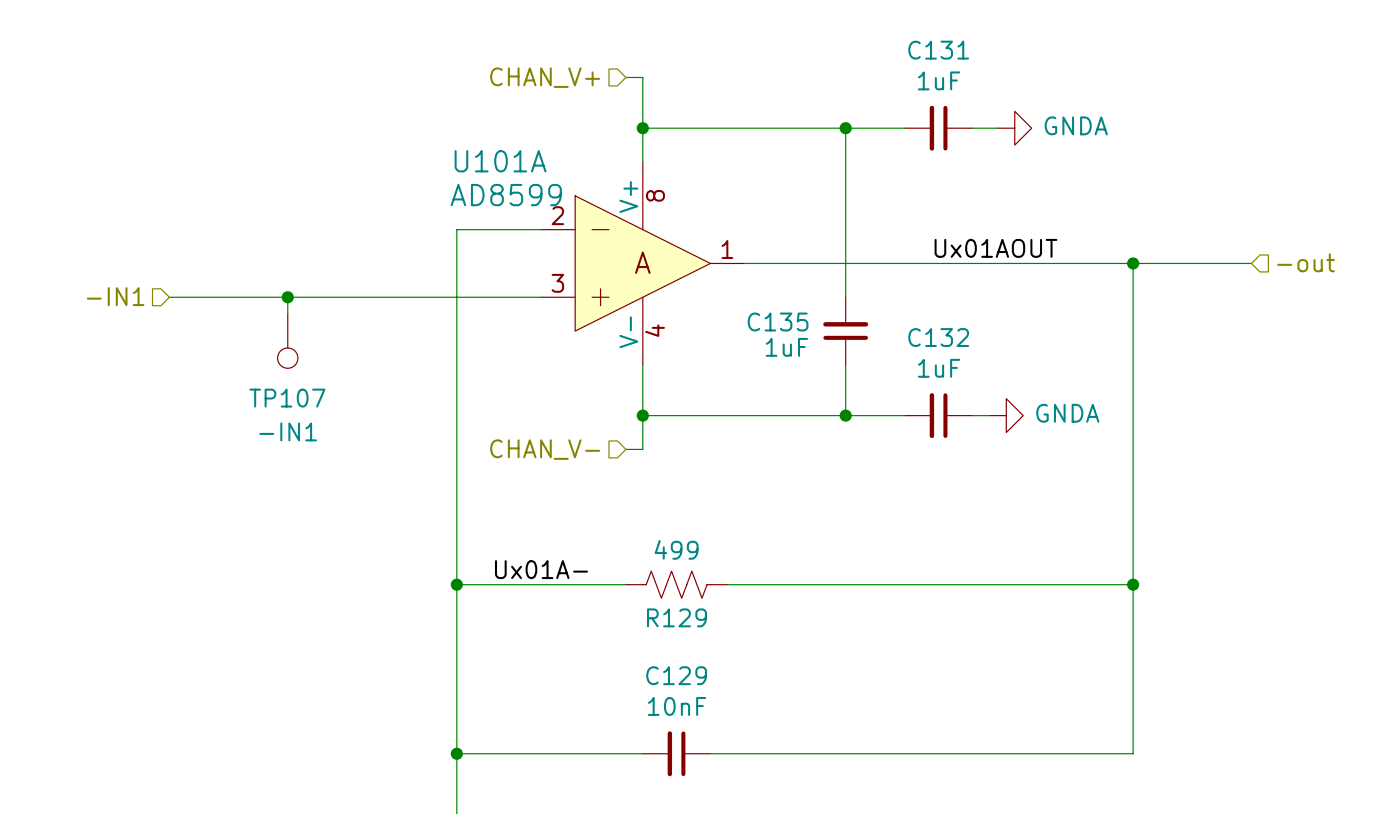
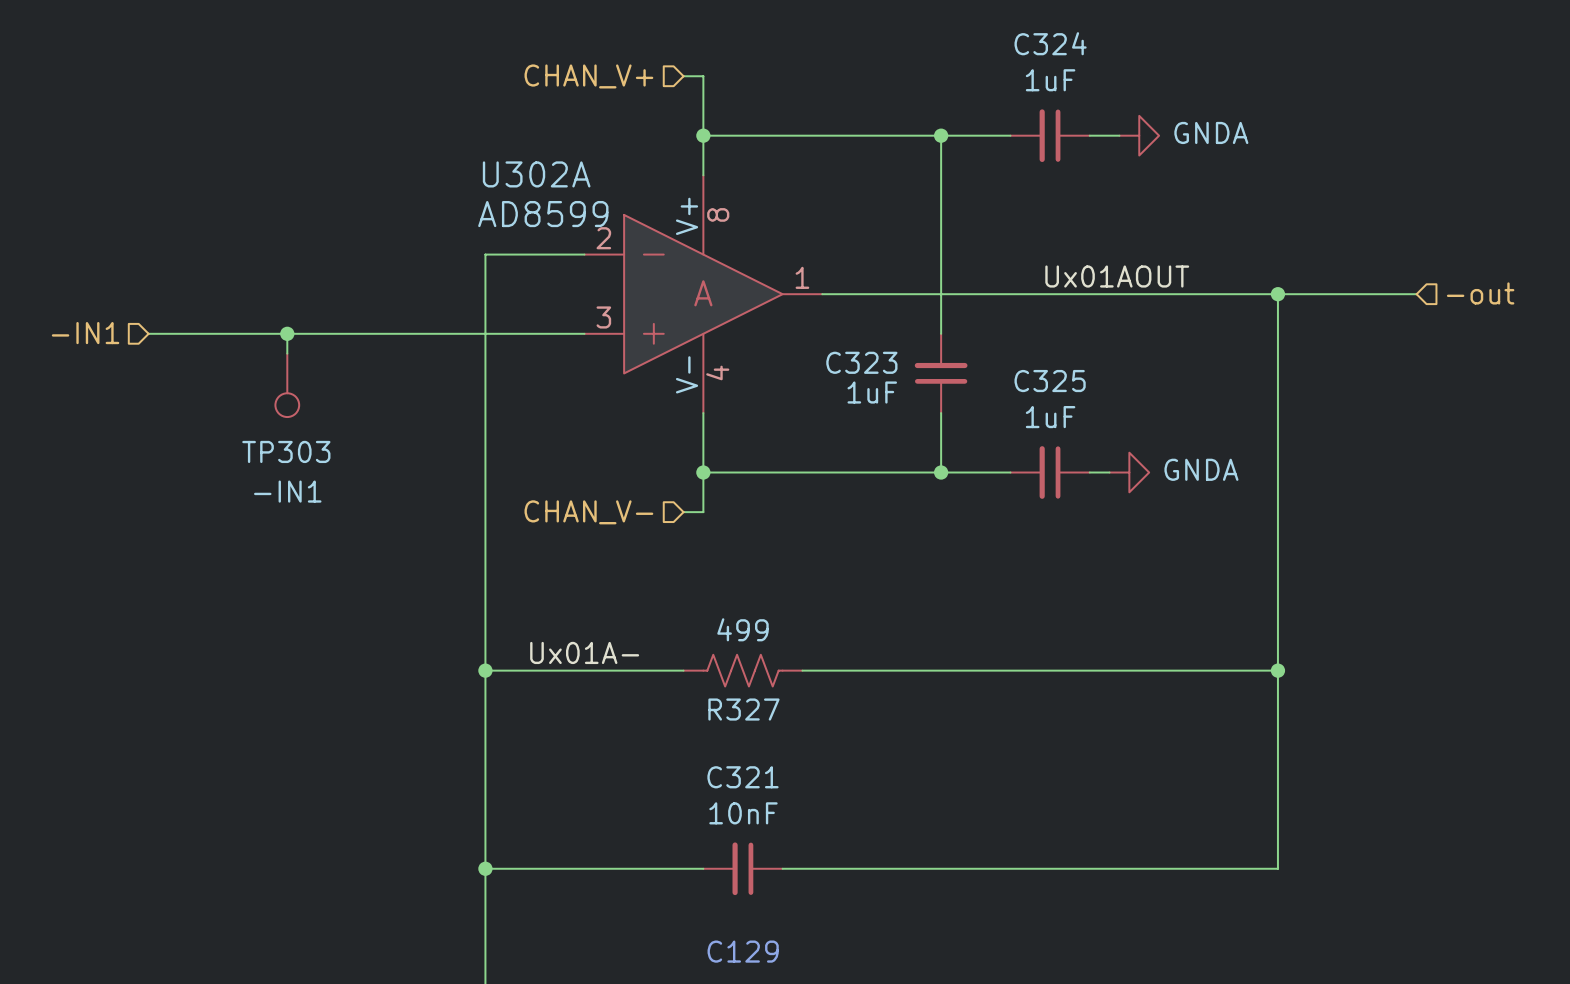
C131 name: C131 (938, 50) -> C324 (1050, 43)
U101A name: U101A (500, 161) -> U302A (536, 174)
C135 name: C135 (778, 322) -> C323 (861, 362)
C132 name: C132 (938, 337) -> C325 (1050, 381)
TP107 name: TP107 (287, 398) -> TP303 (286, 451)
R129 name: R129 (677, 617) -> R327 (743, 709)
C129 name: C129 (676, 675) -> C321 (743, 777)

